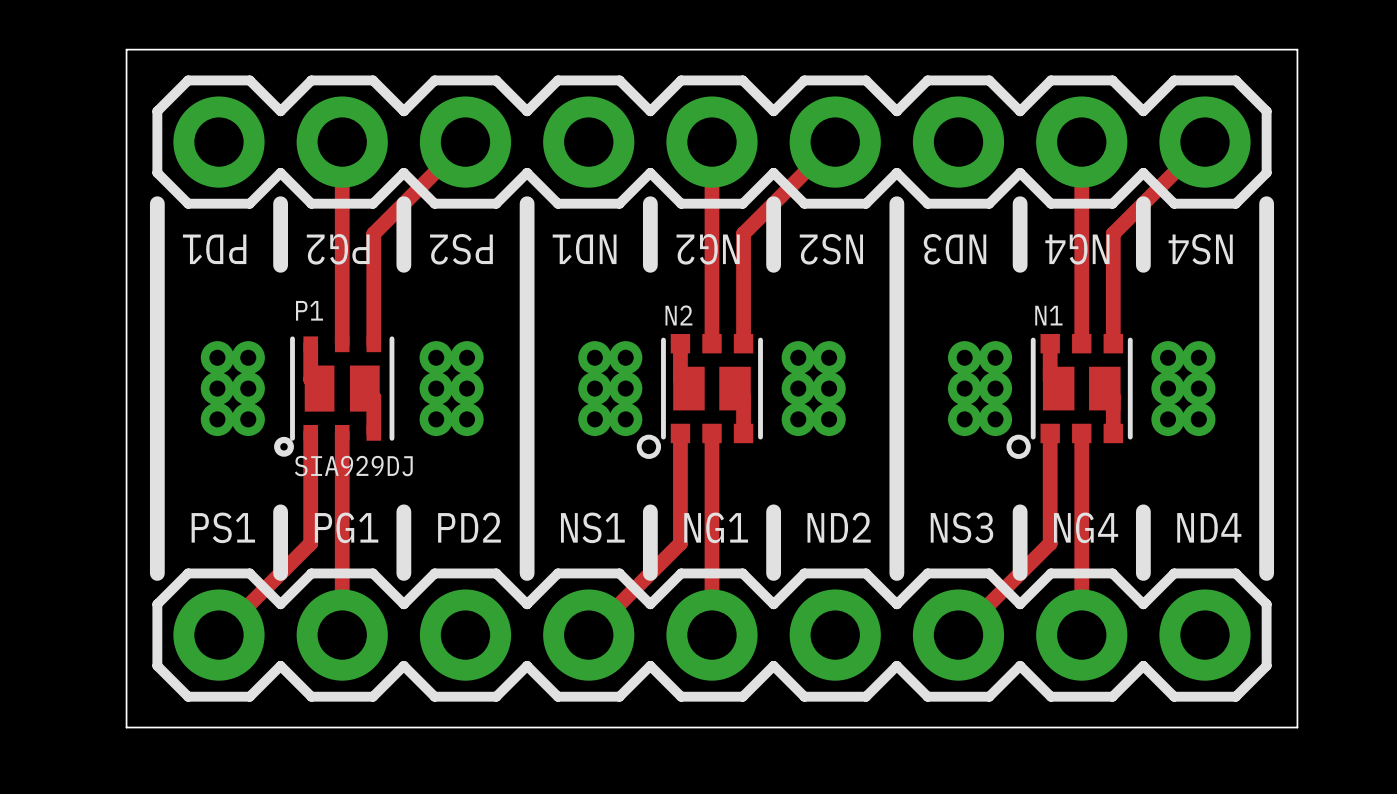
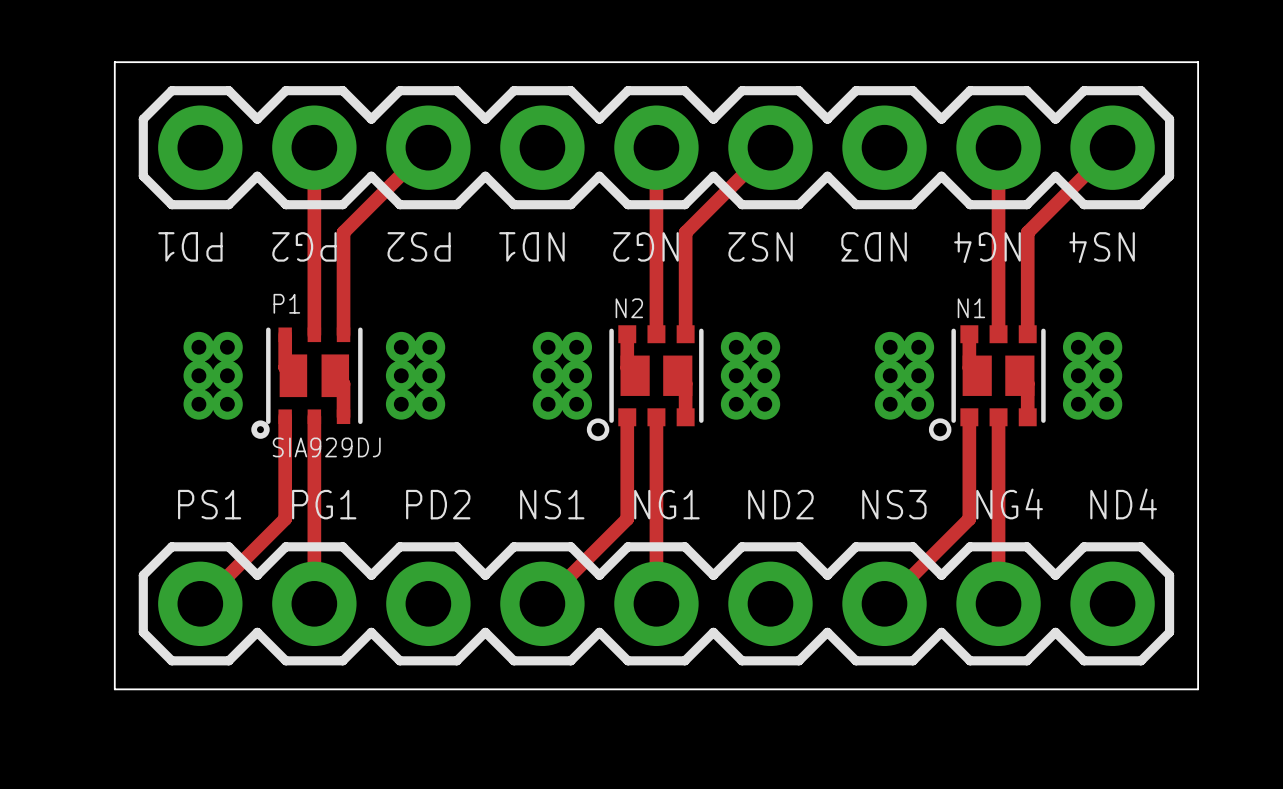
line: (157, 203) (157, 573) -> none
line: (280, 203) (280, 265) -> none
line: (403, 203) (403, 265) -> none
line: (527, 203) (527, 573) -> none
line: (650, 203) (650, 265) -> none
line: (773, 203) (773, 265) -> none
line: (896, 203) (896, 573) -> none
line: (1020, 203) (1020, 265) -> none
line: (1143, 203) (1143, 265) -> none
line: (1266, 203) (1266, 573) -> none
line: (280, 511) (280, 573) -> none
line: (403, 511) (403, 573) -> none
line: (650, 511) (650, 573) -> none
line: (773, 511) (773, 573) -> none
line: (1020, 511) (1020, 573) -> none
line: (1143, 511) (1143, 573) -> none

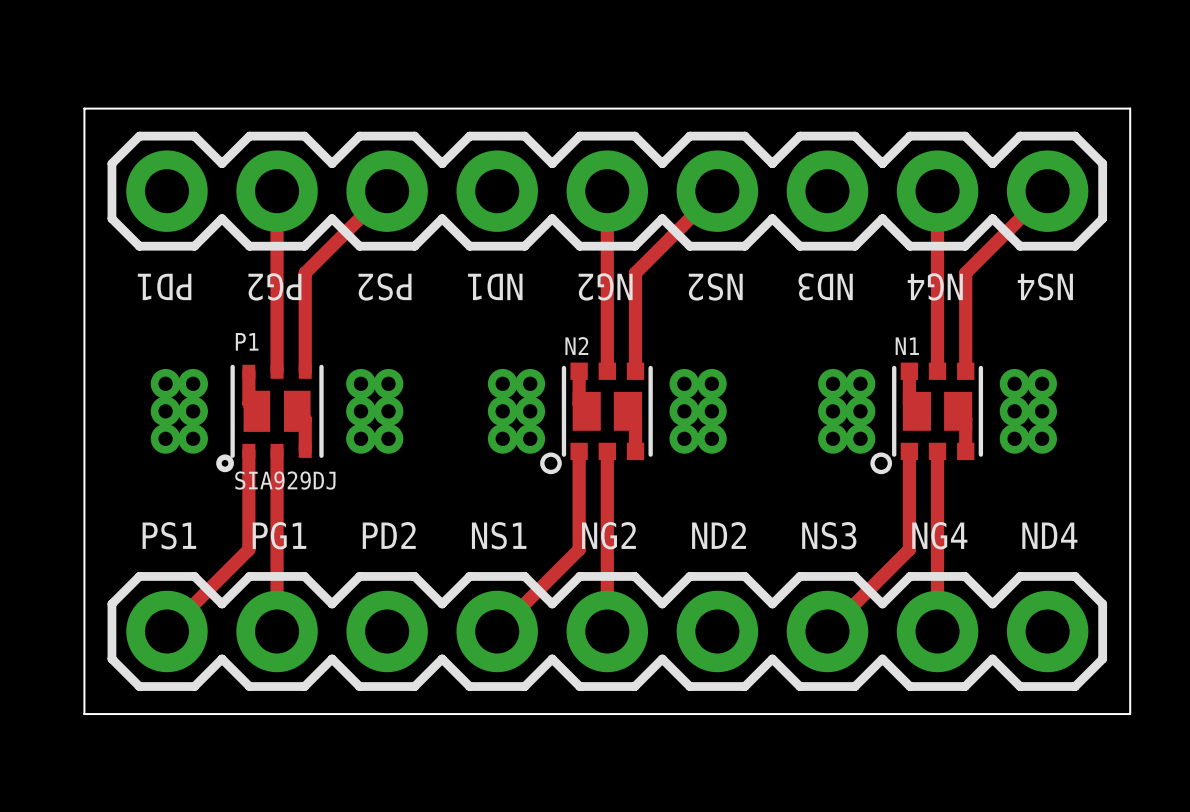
text: NG1 (666, 504) -> NG2 (608, 535)

